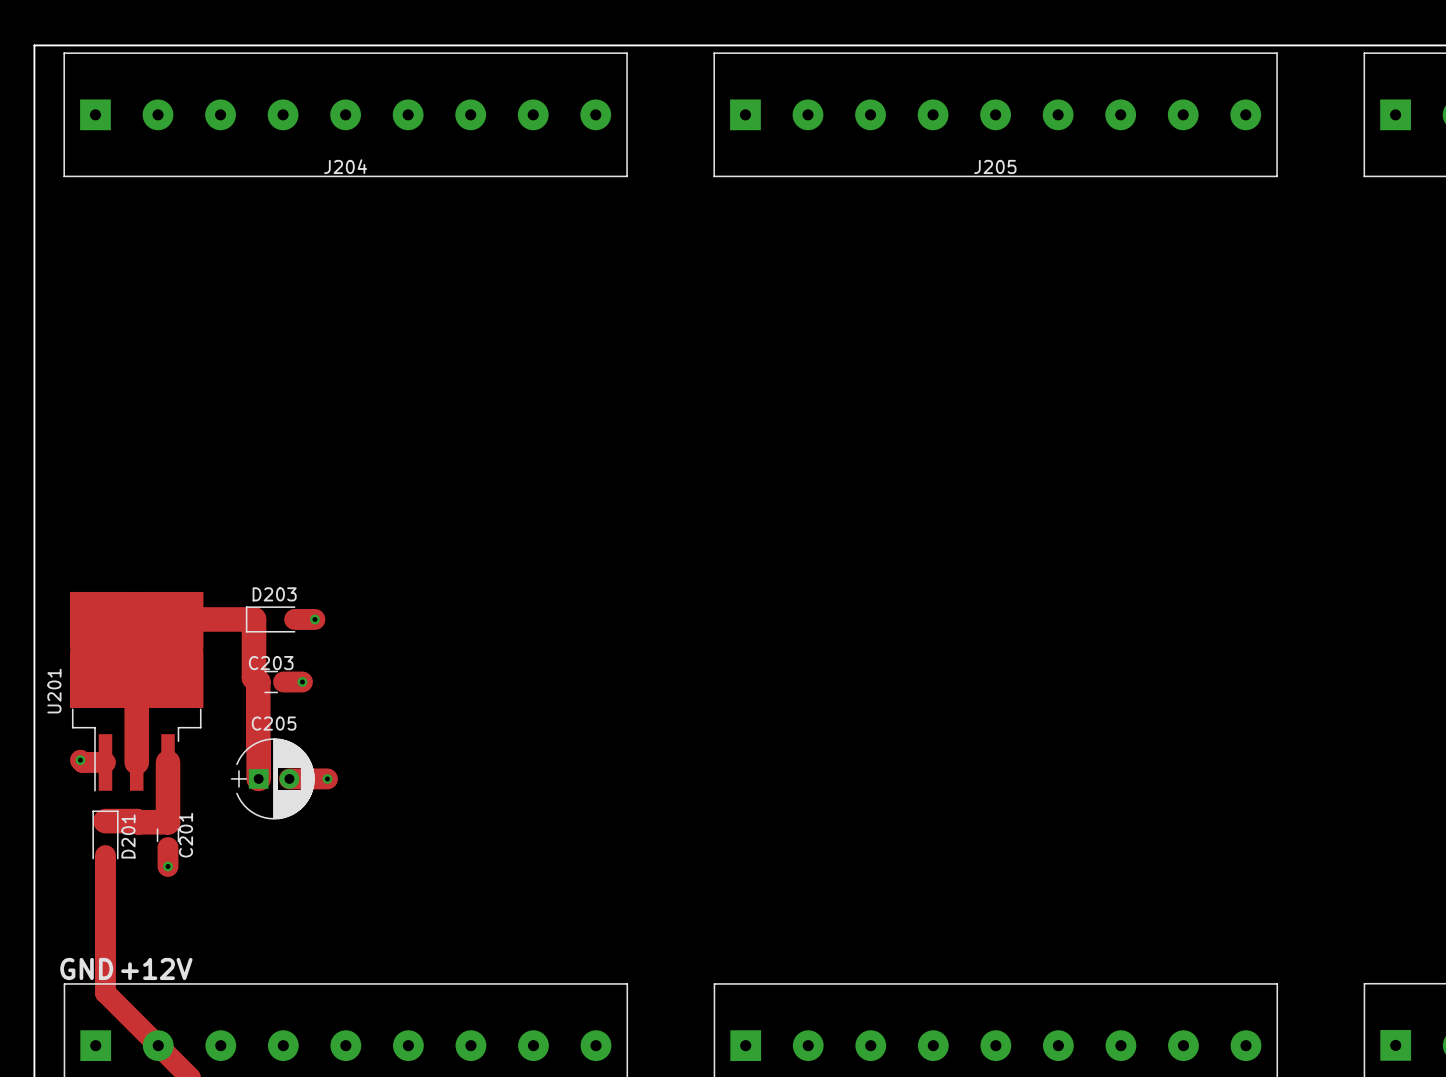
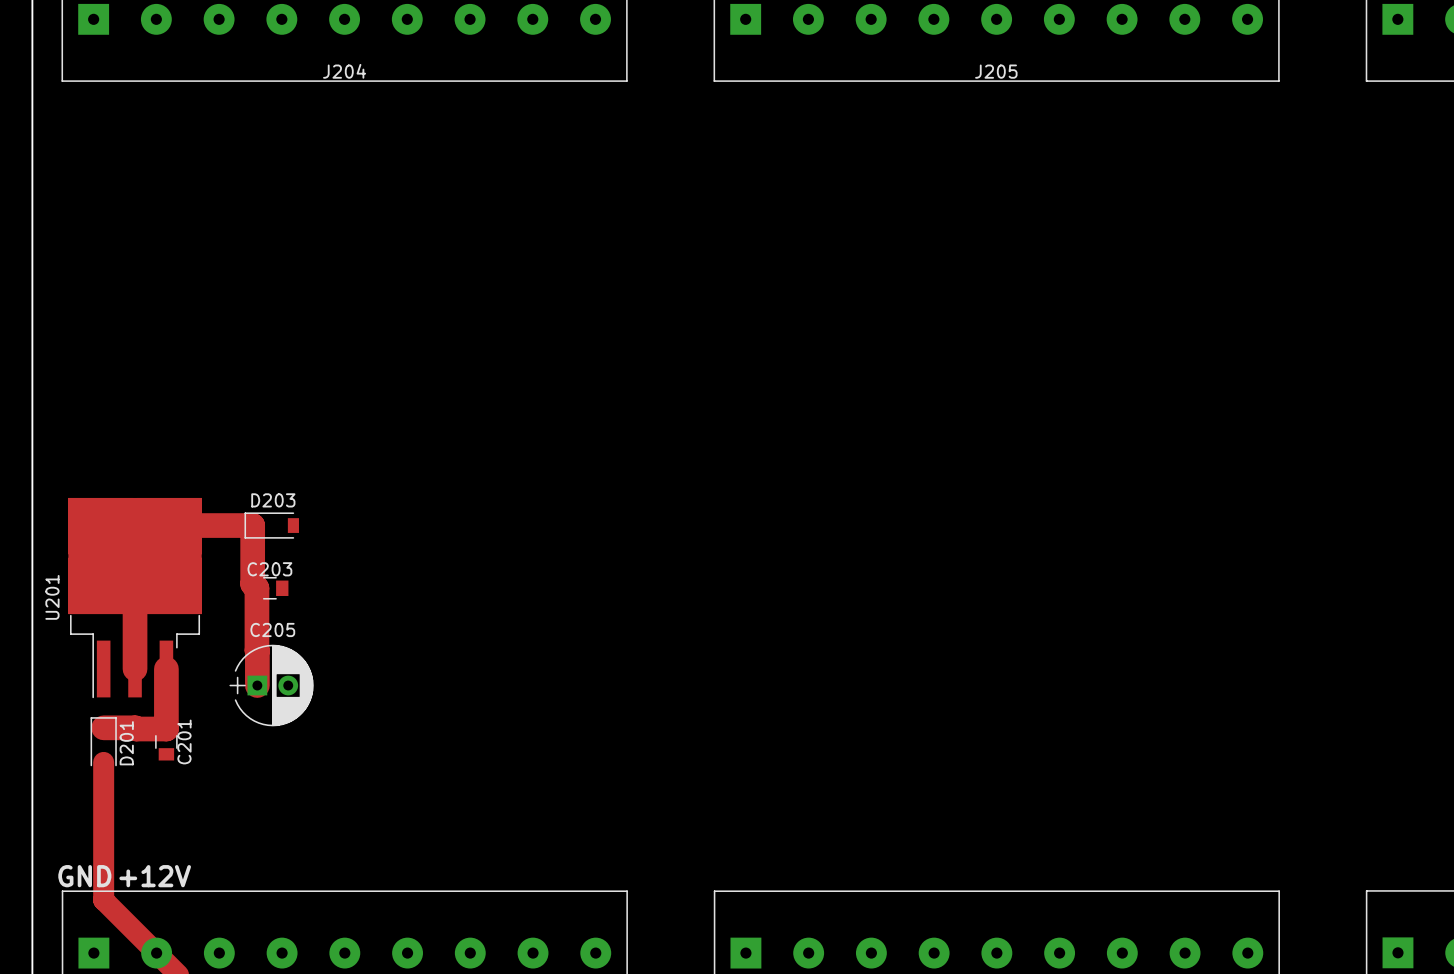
track: (294, 619) (314, 619) -> none
via: (314, 619) -> none
track: (283, 681) (302, 681) -> none
via: (302, 681) -> none
track: (80, 760) (82, 762) (105, 762) -> none
via: (80, 760) -> none
track: (289, 778) (327, 778) -> none
via: (327, 778) -> none
track: (168, 847) (168, 866) -> none
via: (168, 866) -> none

